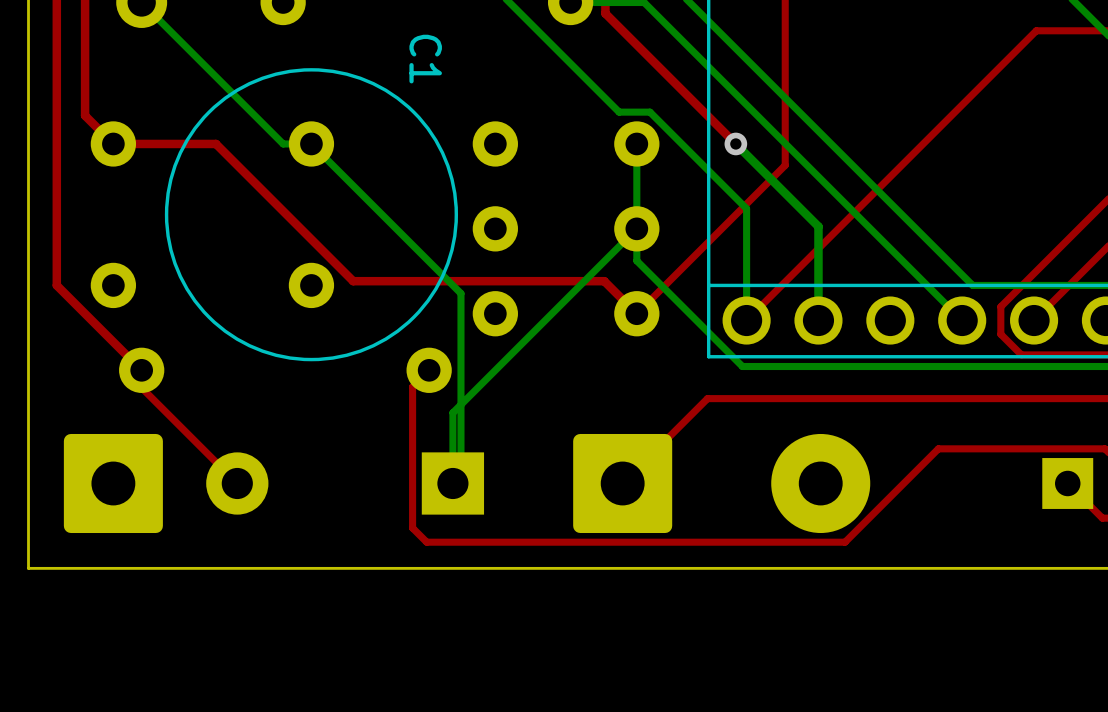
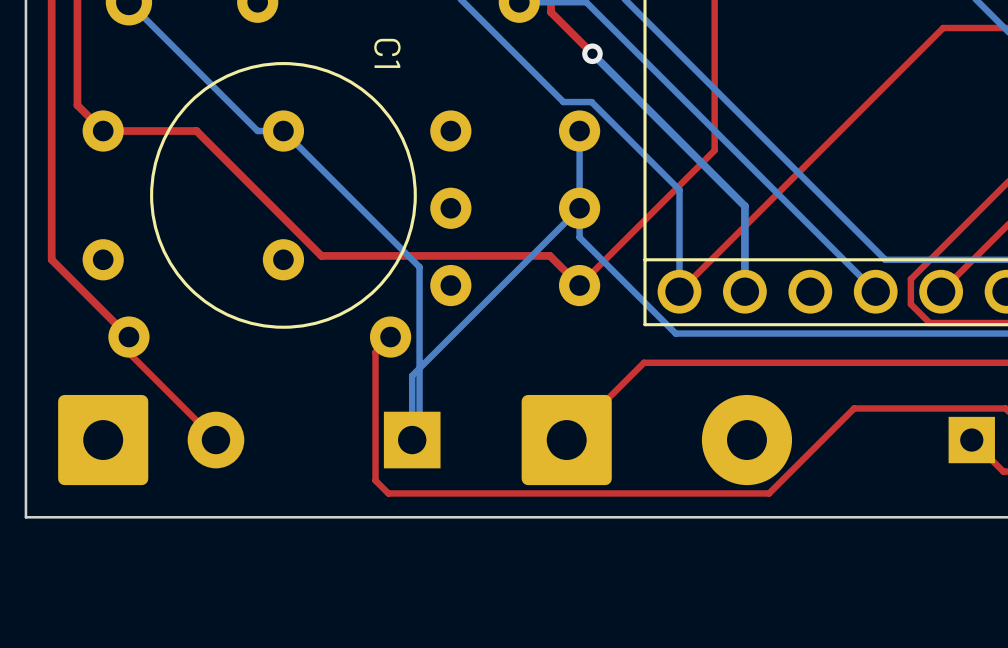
top track: (650, 59) (735, 143) -> none
bottom track: none -> (592, 53) (669, 131)
via position: (735, 143) -> (592, 53)

